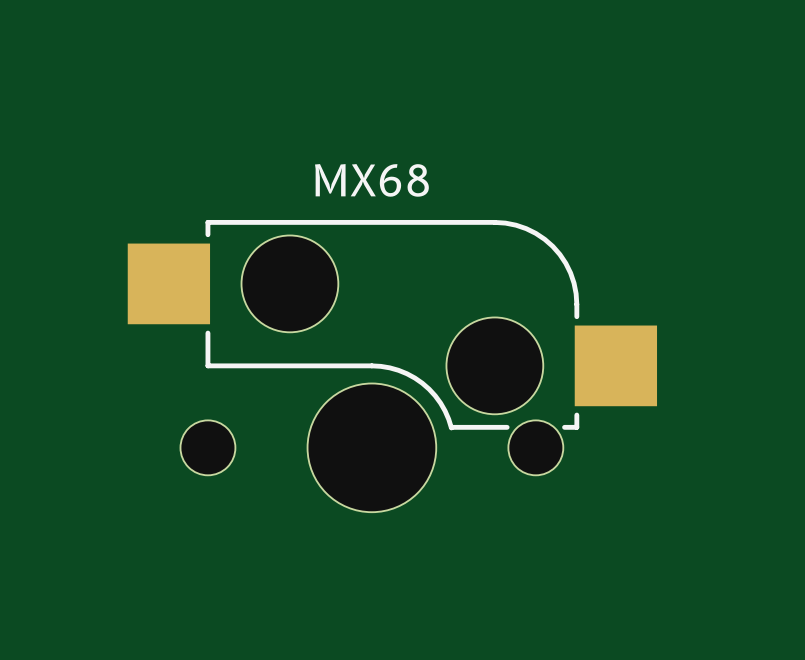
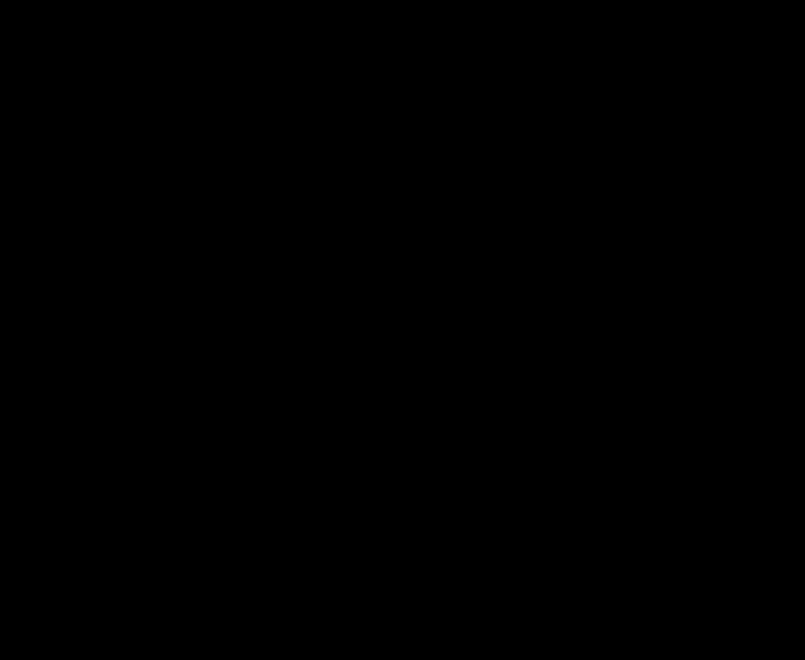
MX68: (392, 366) -> none

